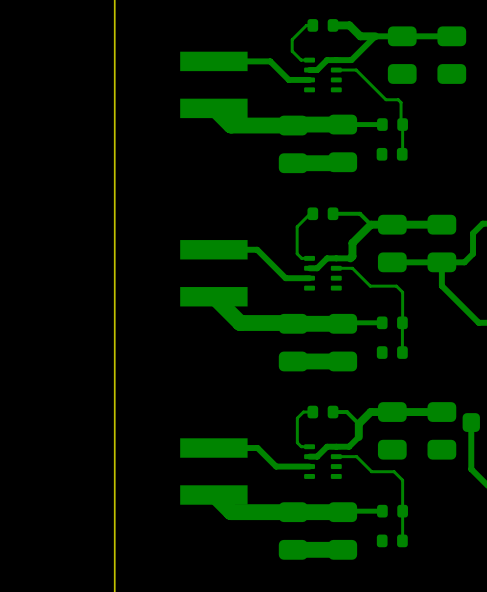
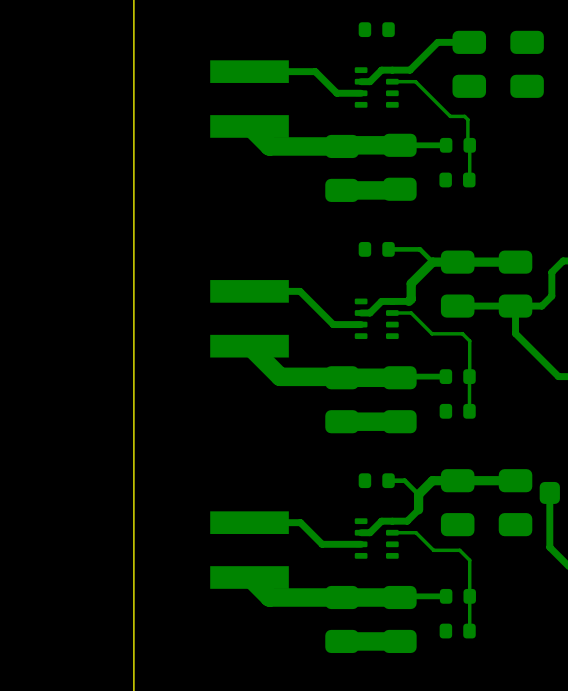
bottom track: (312, 25) (306, 25) (292, 39) (292, 51) (301, 60) (309, 60) -> none
bottom track: (333, 25) (349, 25) (360, 36) (375, 36) -> none
bottom track: (402, 36) (451, 36) -> none
bottom track: (312, 213) (310, 213) (297, 226) (297, 253) (301, 258) (309, 258) -> none
bottom track: (312, 412) (303, 412) (297, 418) (297, 442) (301, 446) (309, 446) -> none

